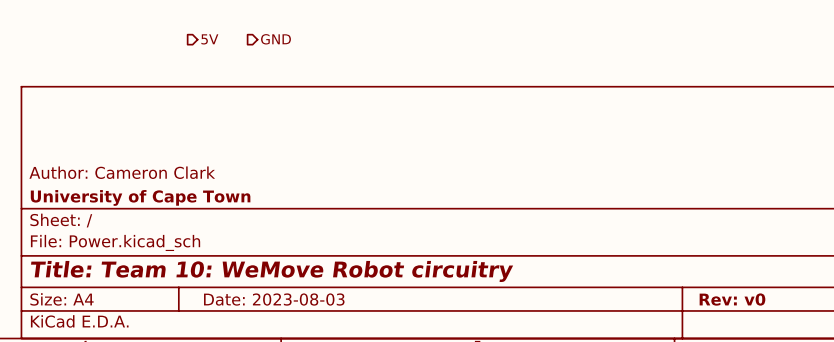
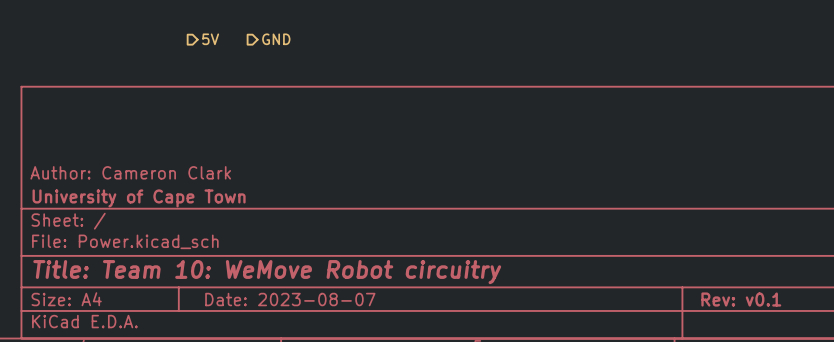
title block: Date: 2023-08-03 (274, 299) -> Date: 2023-08-07 (290, 299)
title block: Rev: v0 (732, 299) -> Rev: v0.1 (741, 299)

